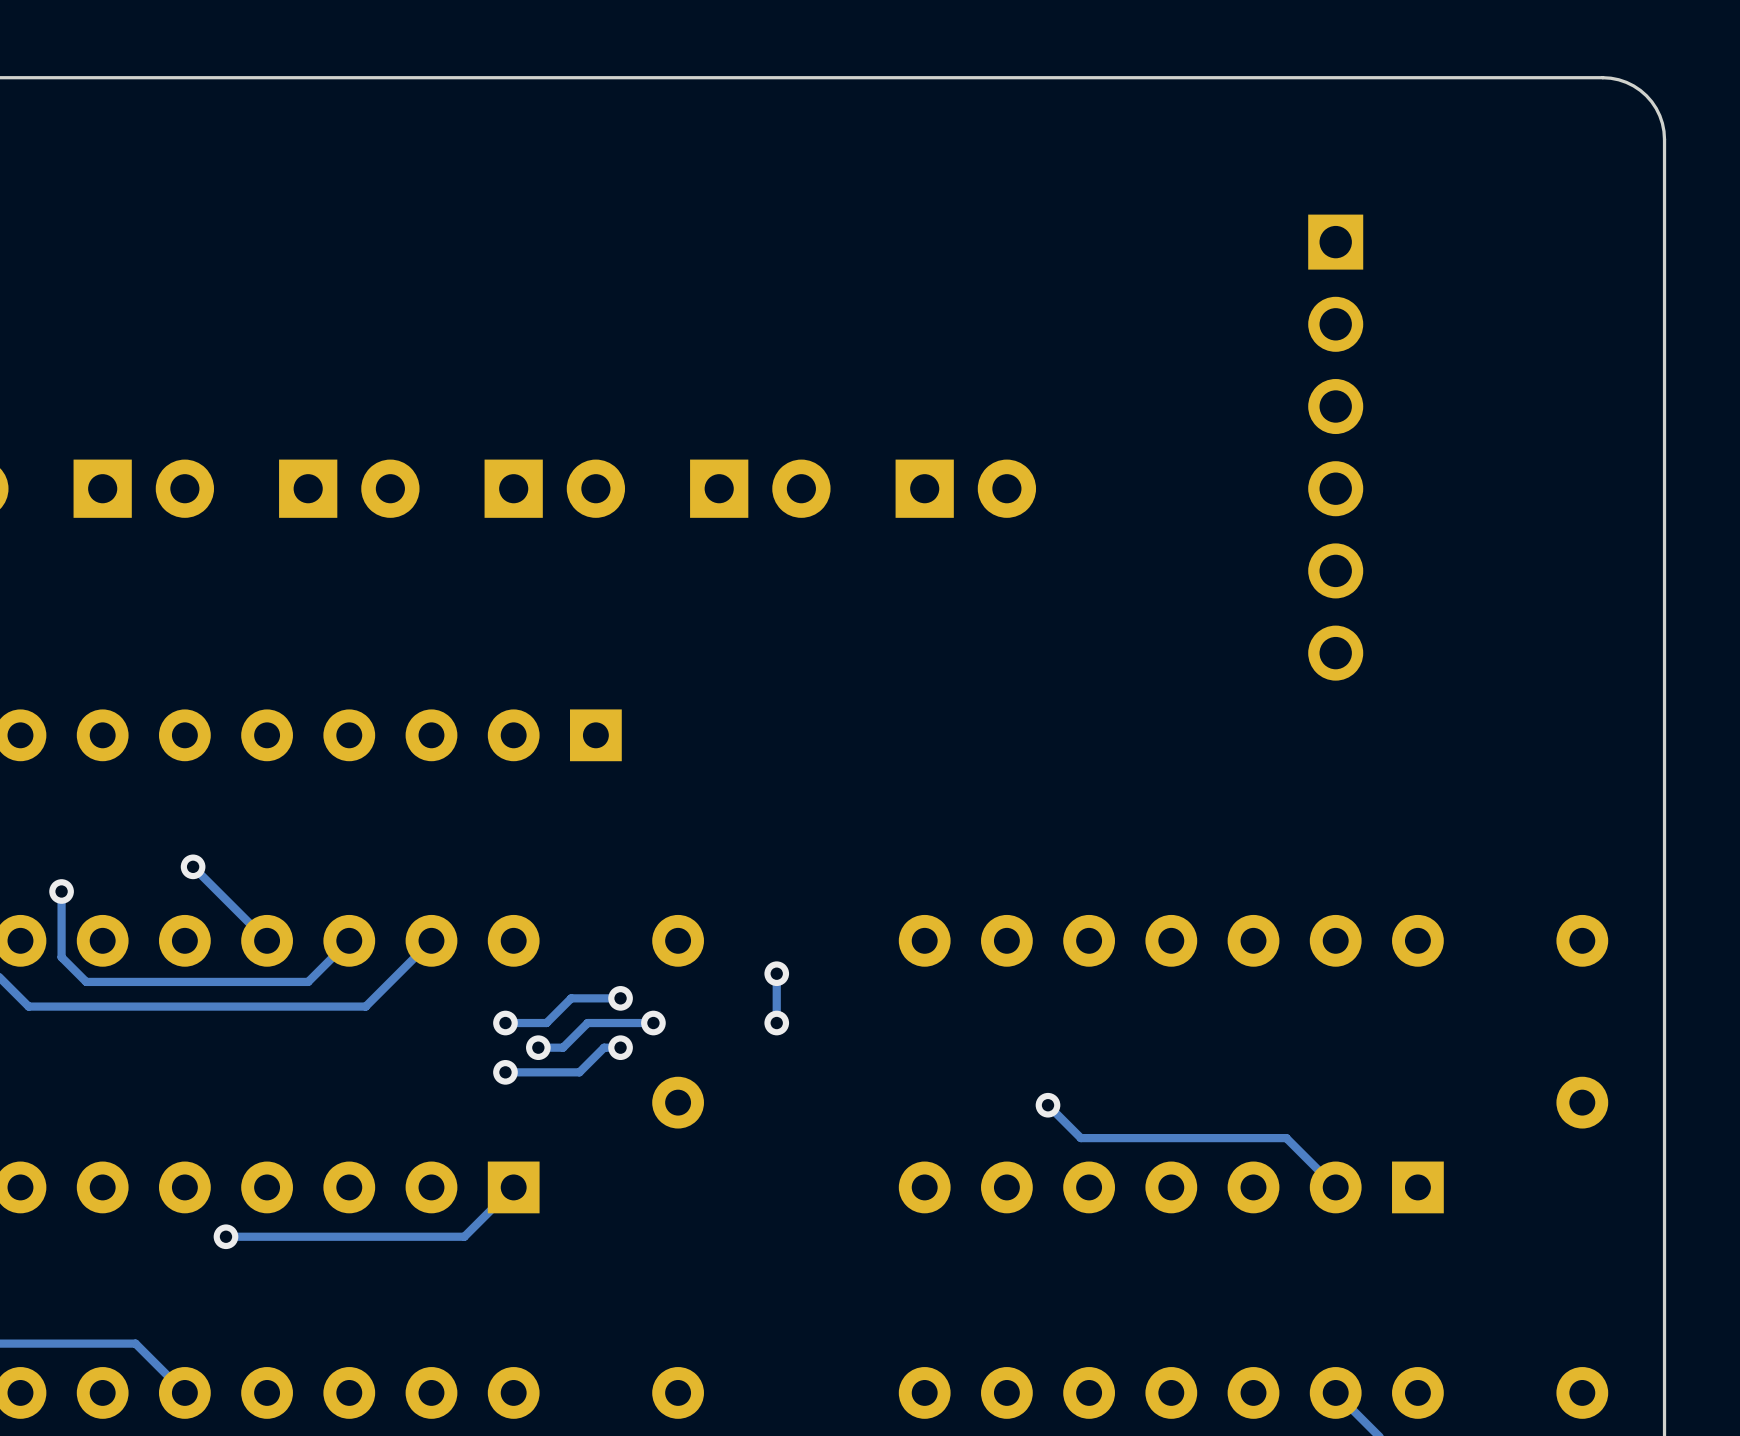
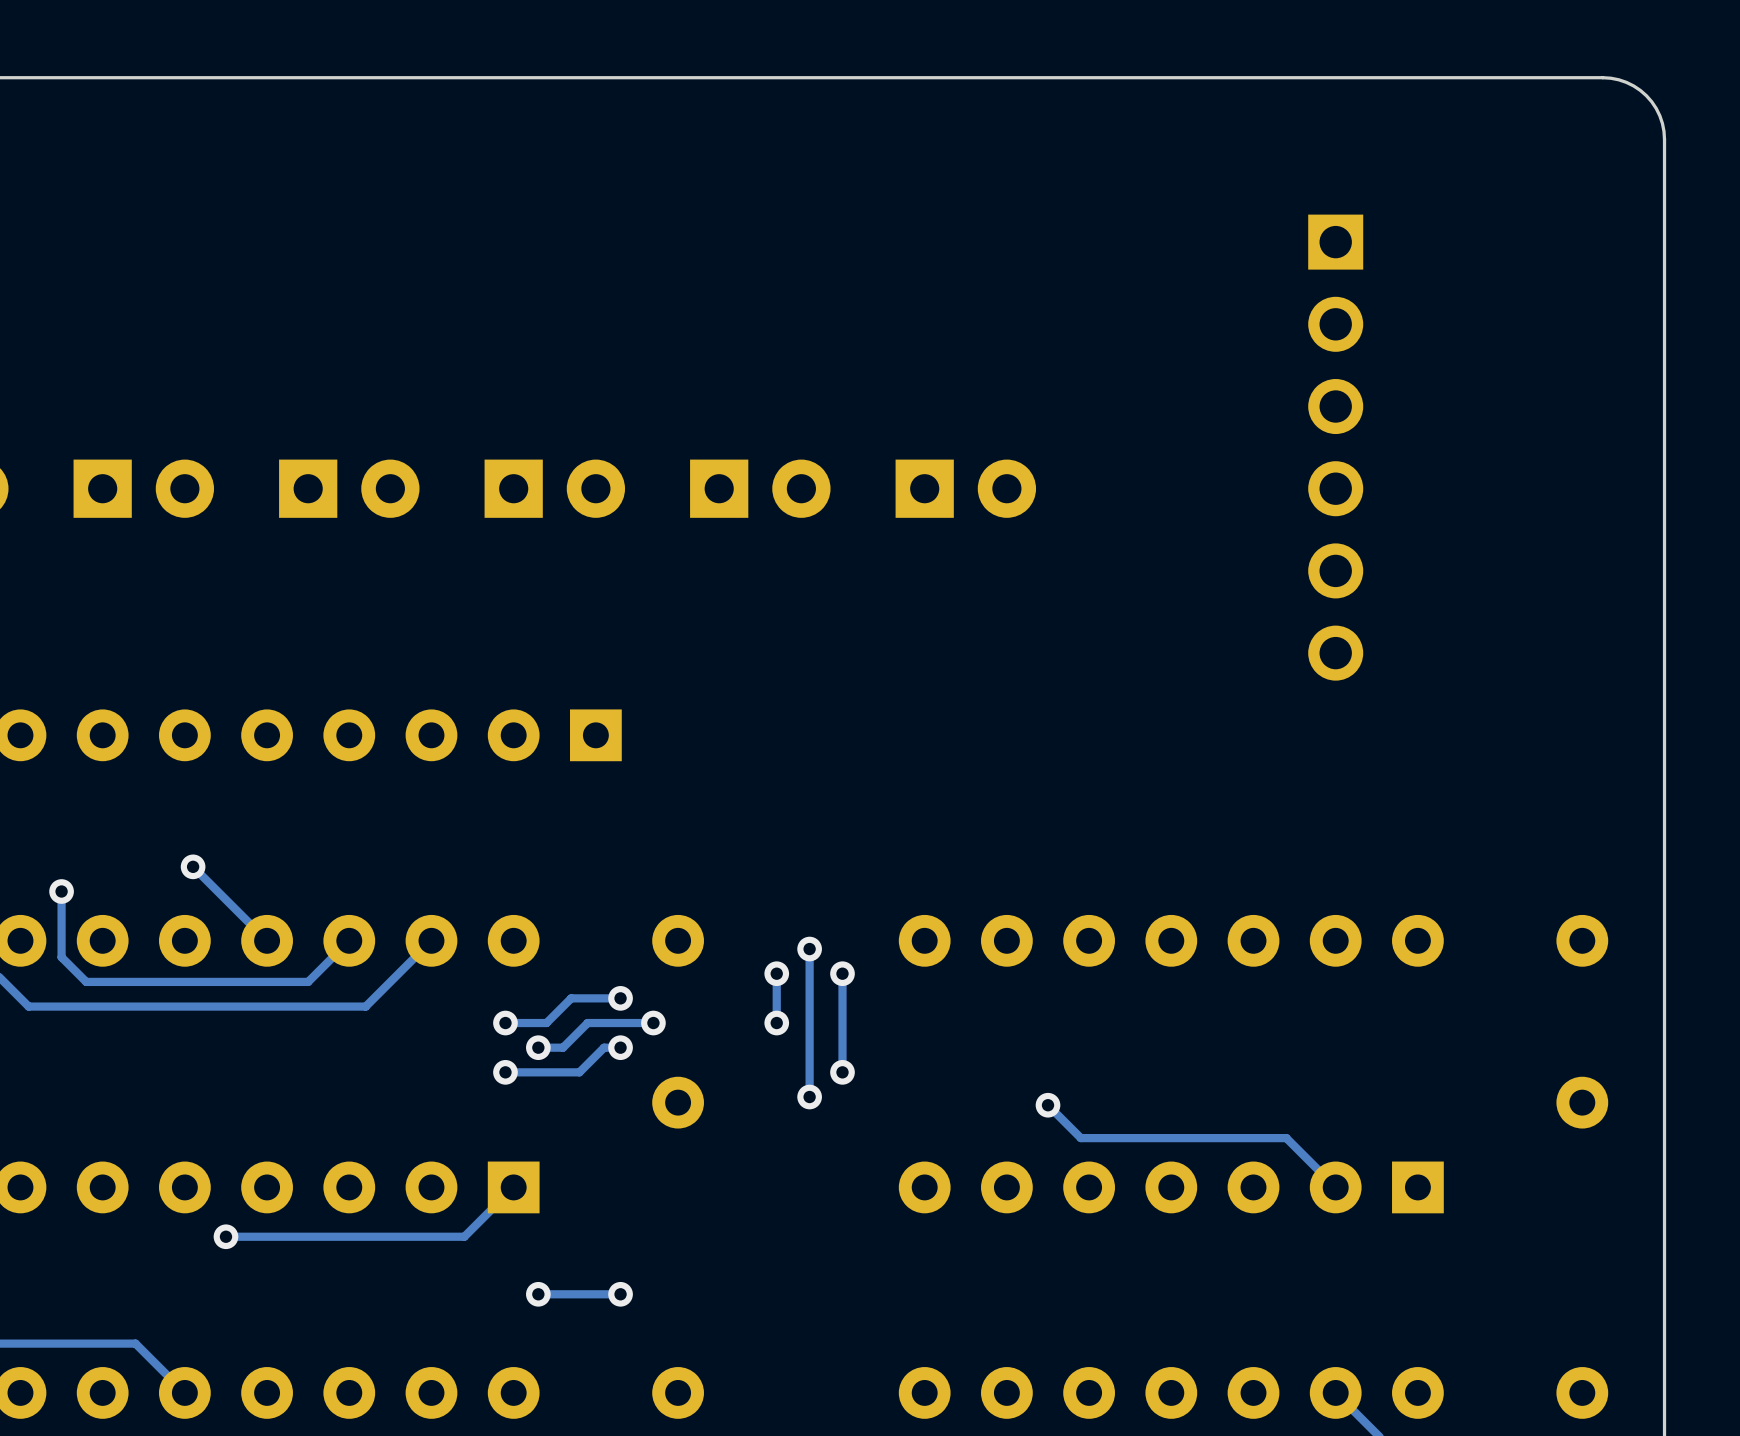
track: none -> (809, 949) (809, 1097)
via: none -> (809, 949)
track: none -> (842, 973) (842, 1072)
via: none -> (842, 973)
via: none -> (842, 1072)
via: none -> (809, 1097)
via: none -> (538, 1294)
track: none -> (620, 1294) (538, 1294)
via: none -> (620, 1294)

